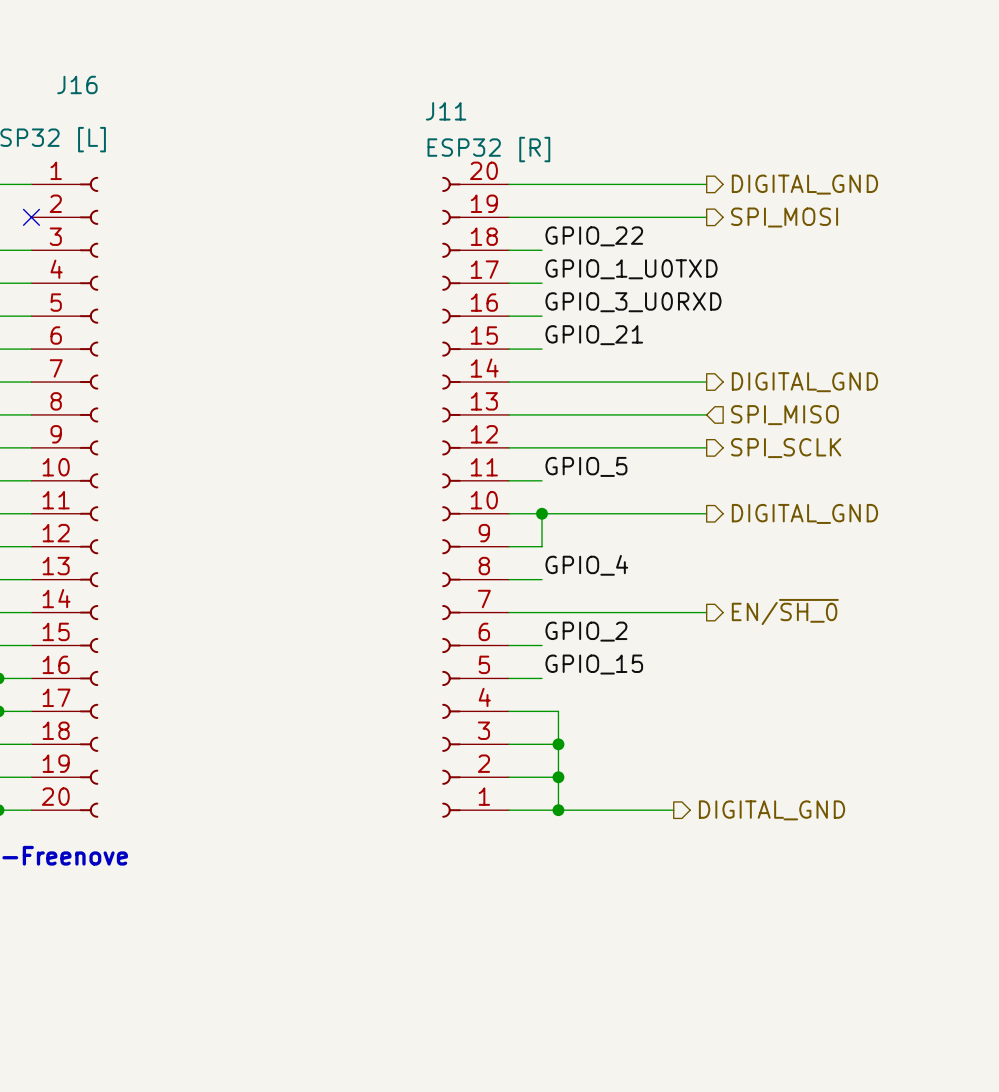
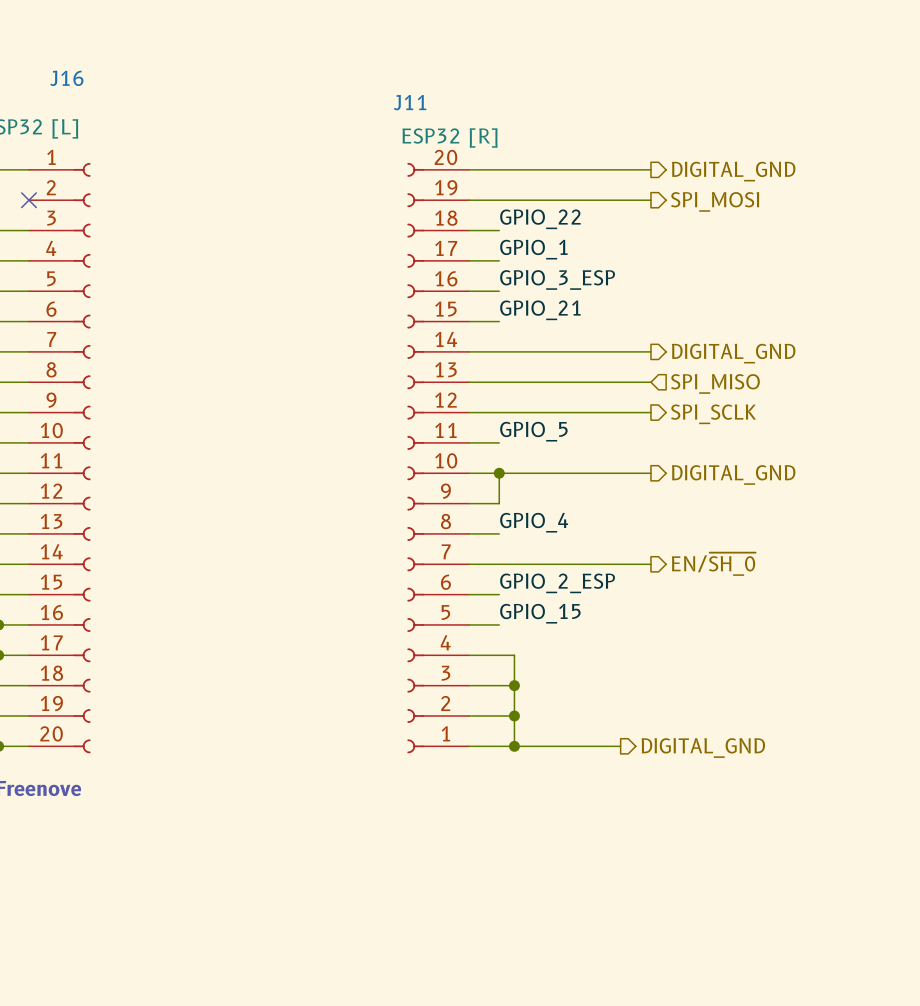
label: GPIO_1_U0TXD (631, 269) -> GPIO_1 (533, 249)
label: GPIO_3_U0RXD (633, 302) -> GPIO_3_ESP (557, 279)
label: GPIO_2 (586, 631) -> GPIO_2_ESP (557, 583)

